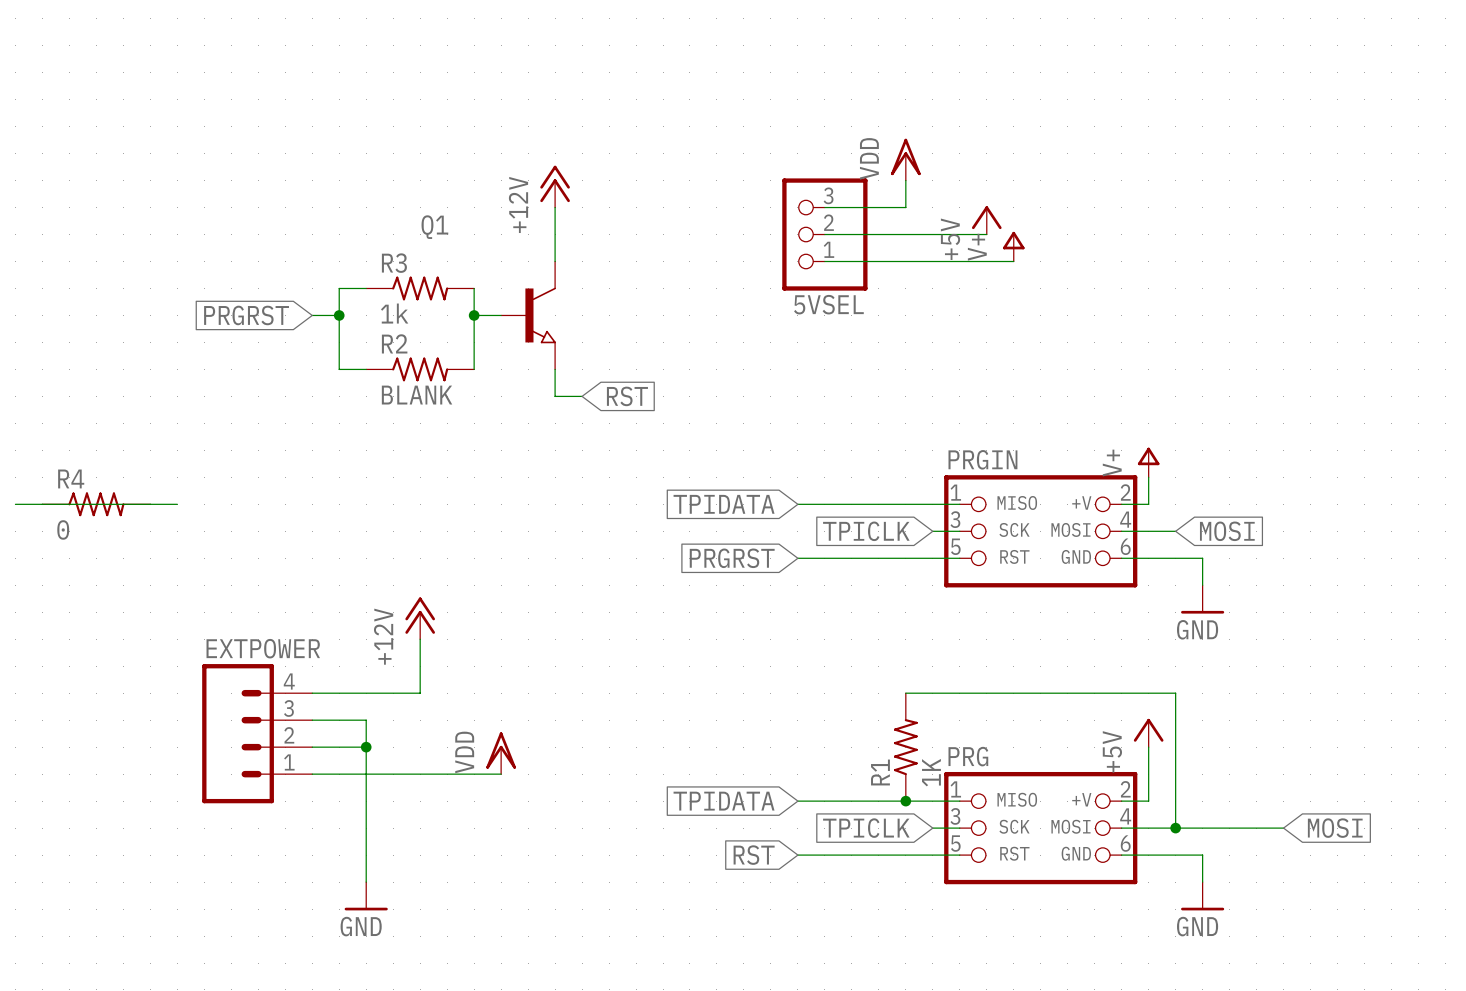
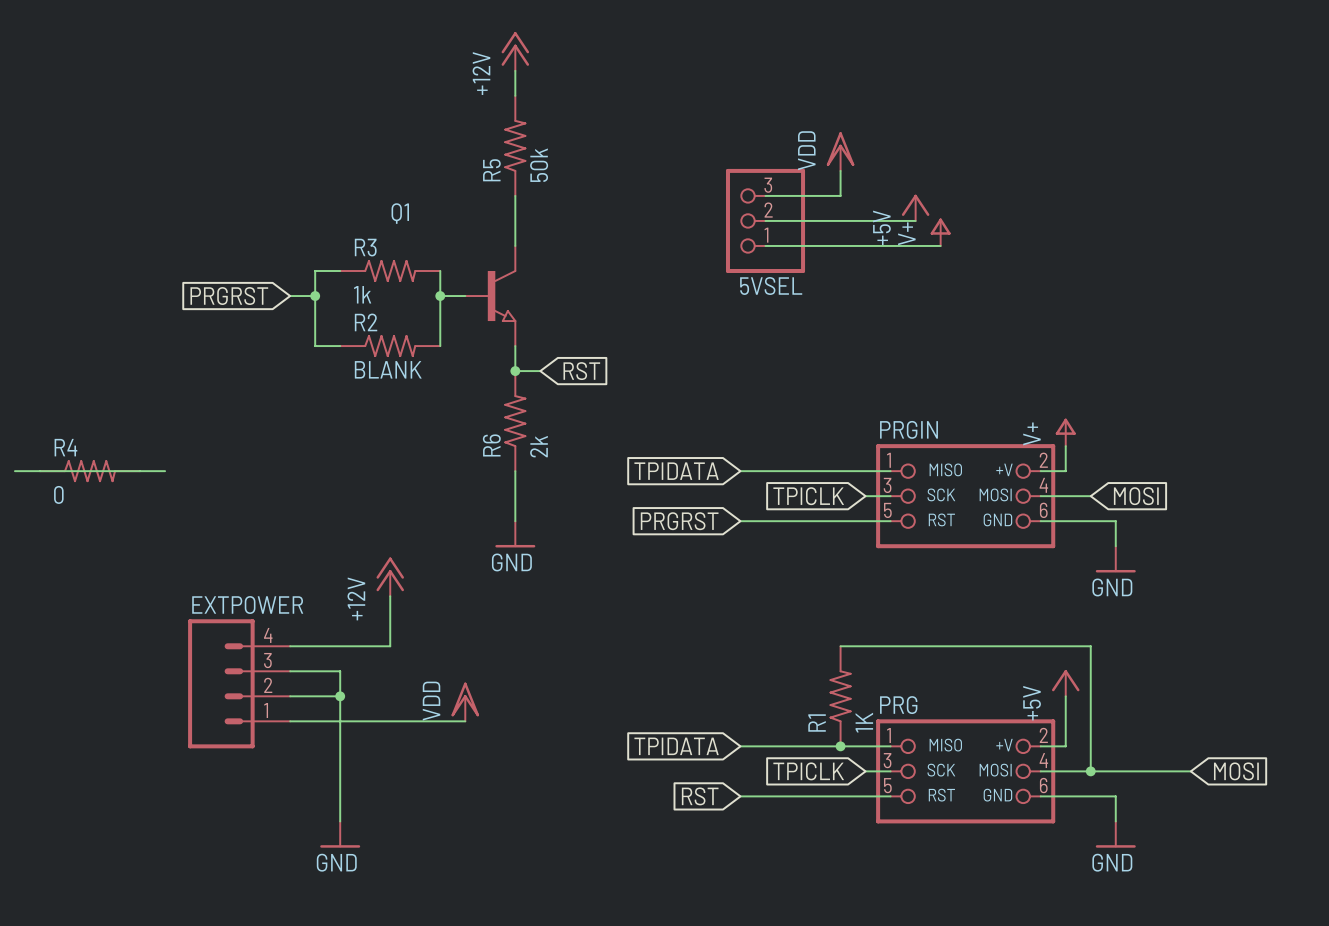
wire: none -> (515, 70) (515, 95)
R5: none -> 50k (515, 145)
power symbol position: +12V (555, 186) -> +12V (515, 51)
junction: none -> (515, 371)
R6: none -> 2k (515, 421)
wire: none -> (515, 471) (515, 521)
power symbol: none -> GND (515, 534)

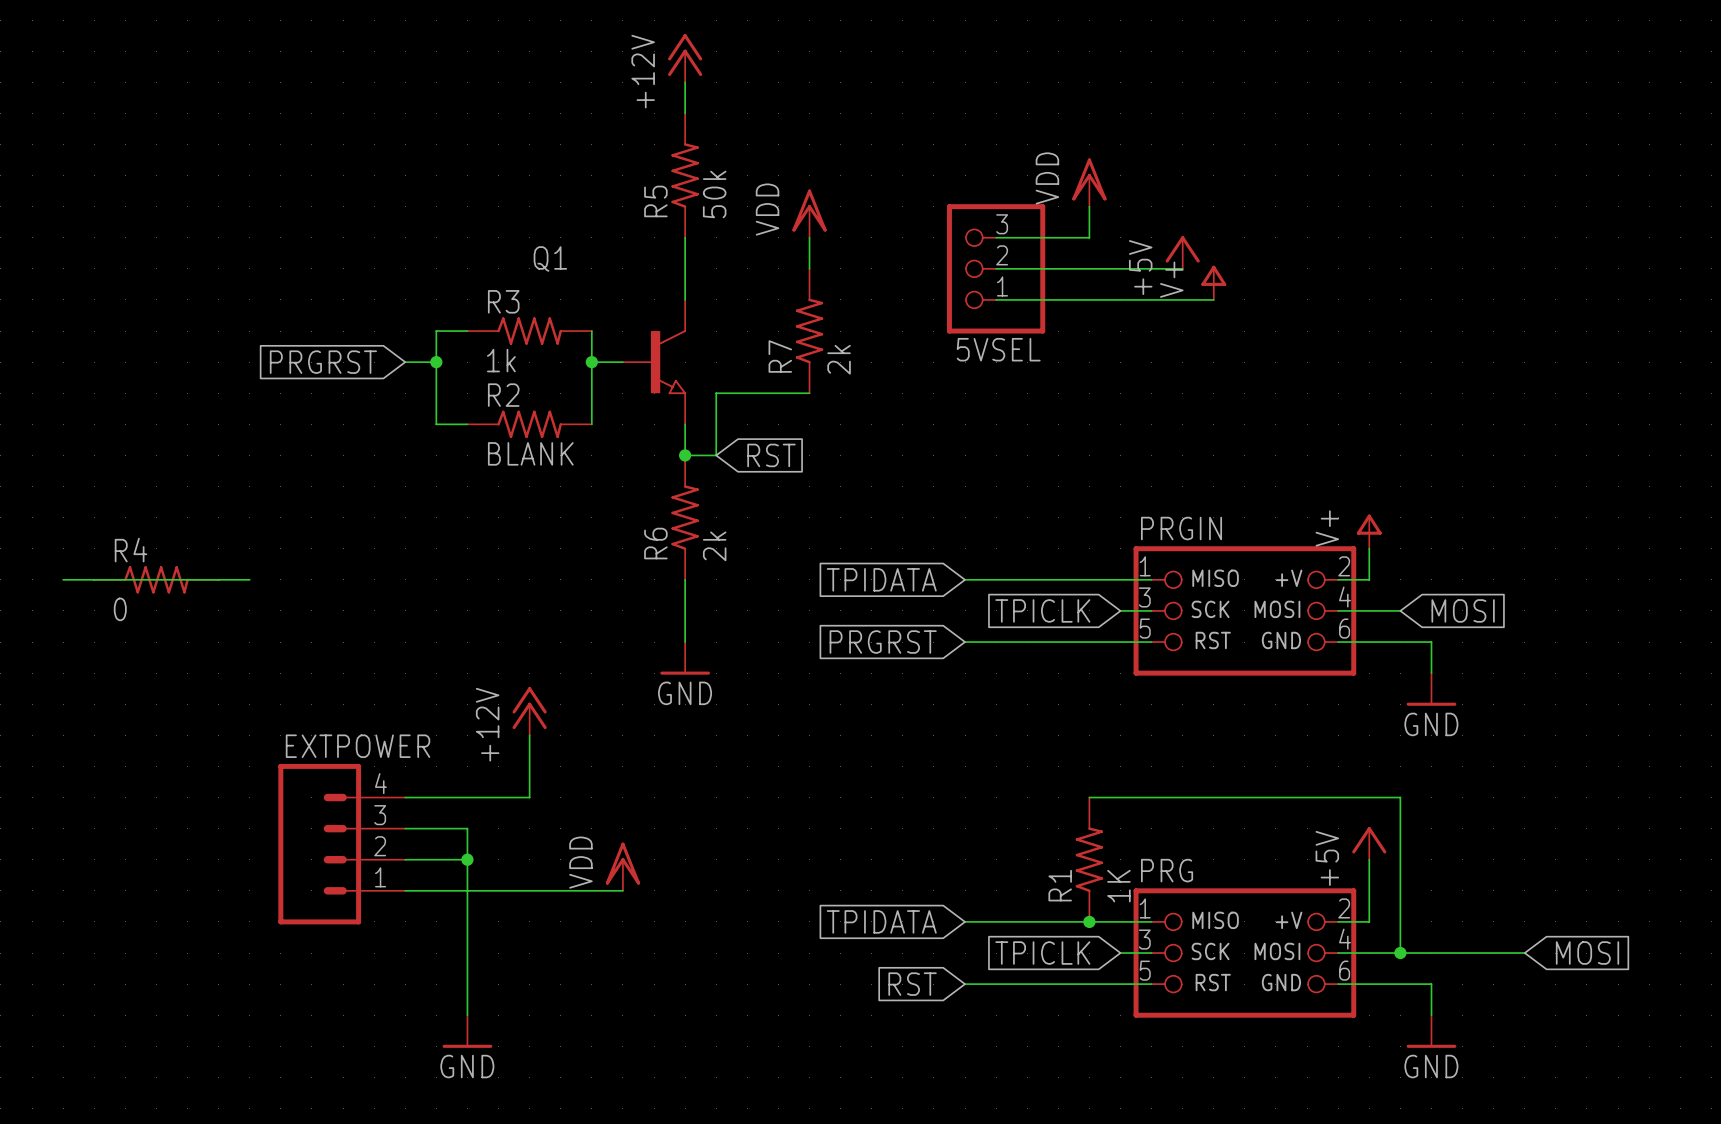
power symbol: none -> VDD (809, 213)
wire: none -> (809, 237) (809, 268)
R7: none -> 2k (809, 331)
wire: none -> (809, 393) (716, 393) (716, 455)

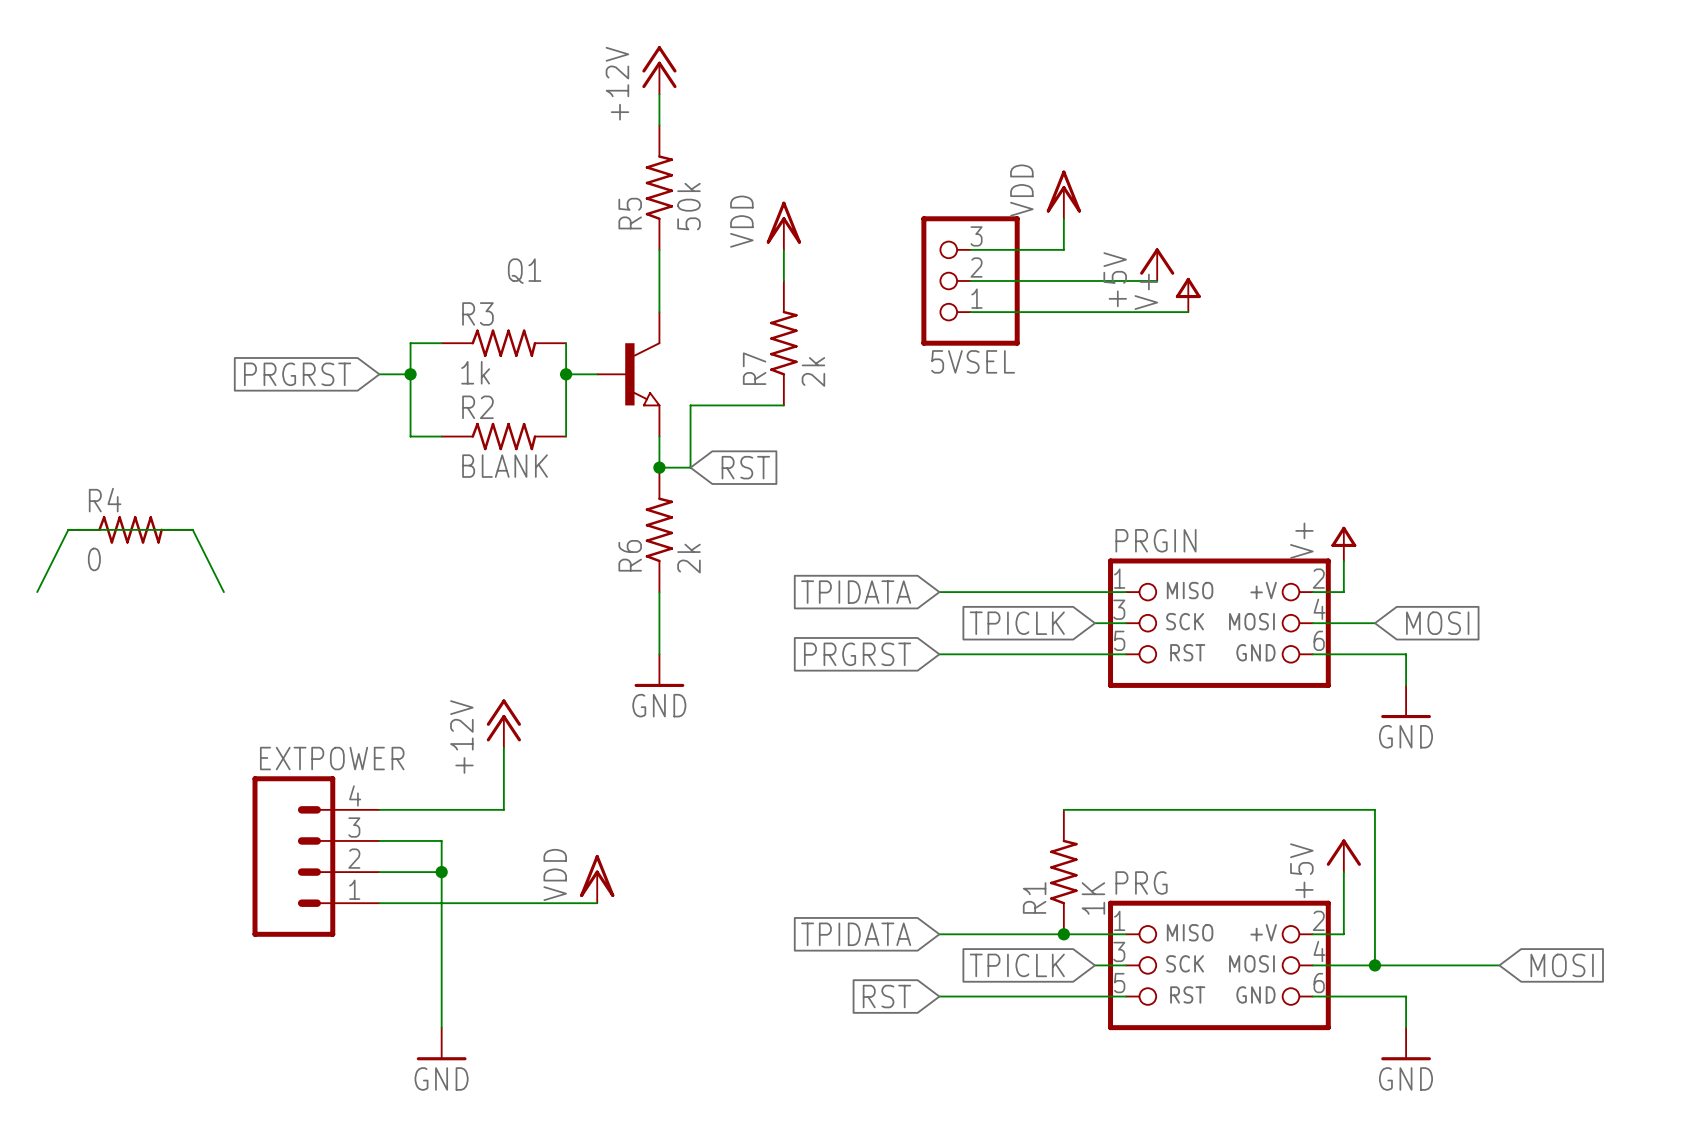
wire: (63, 579) (249, 579) -> (37, 592) (68, 529) (192, 529) (223, 592)
R4 position: (156, 579) -> (130, 529)

